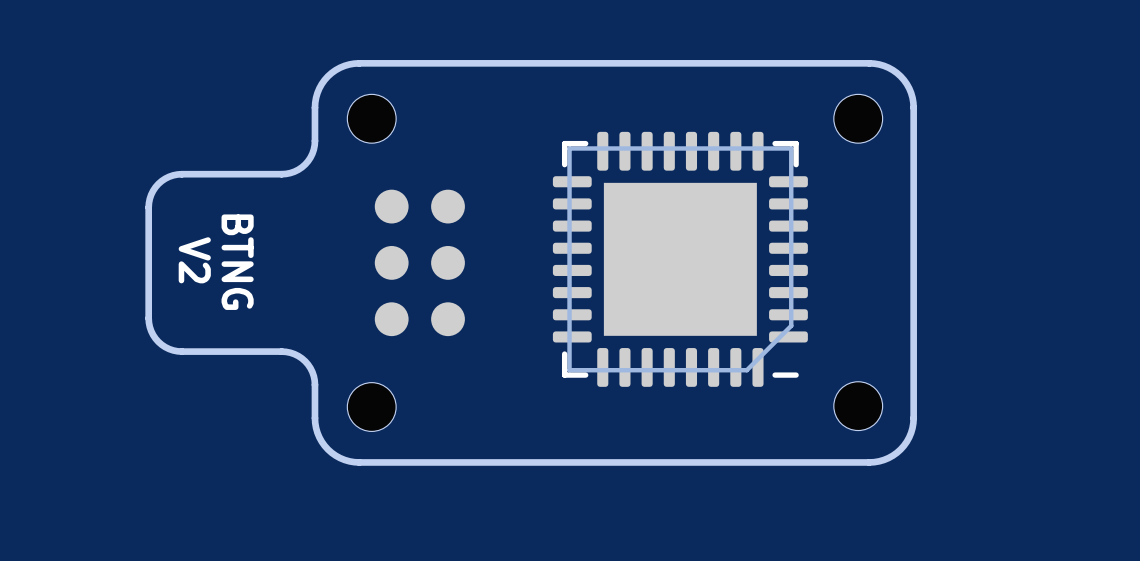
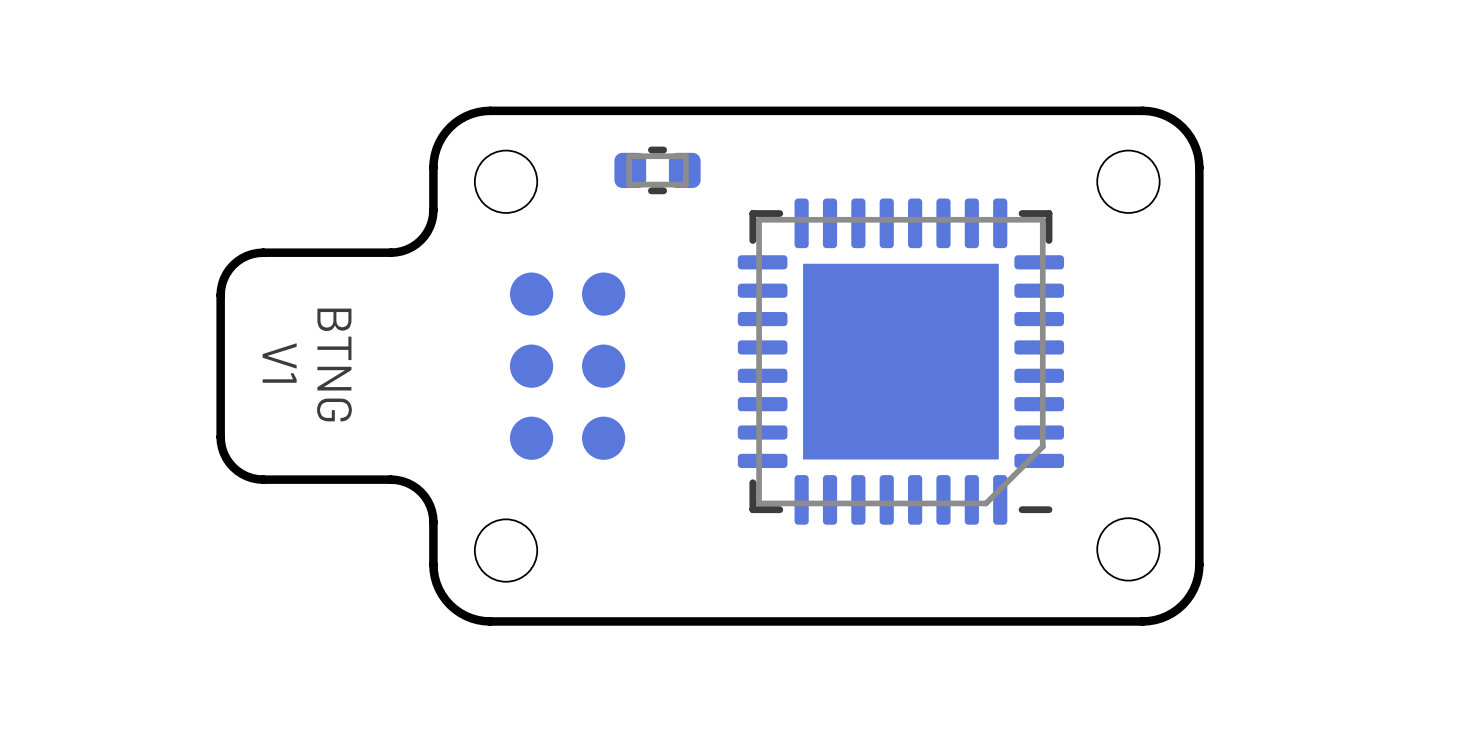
part: none -> (657, 170)
text: V2 (194, 260) -> V1 (279, 363)

